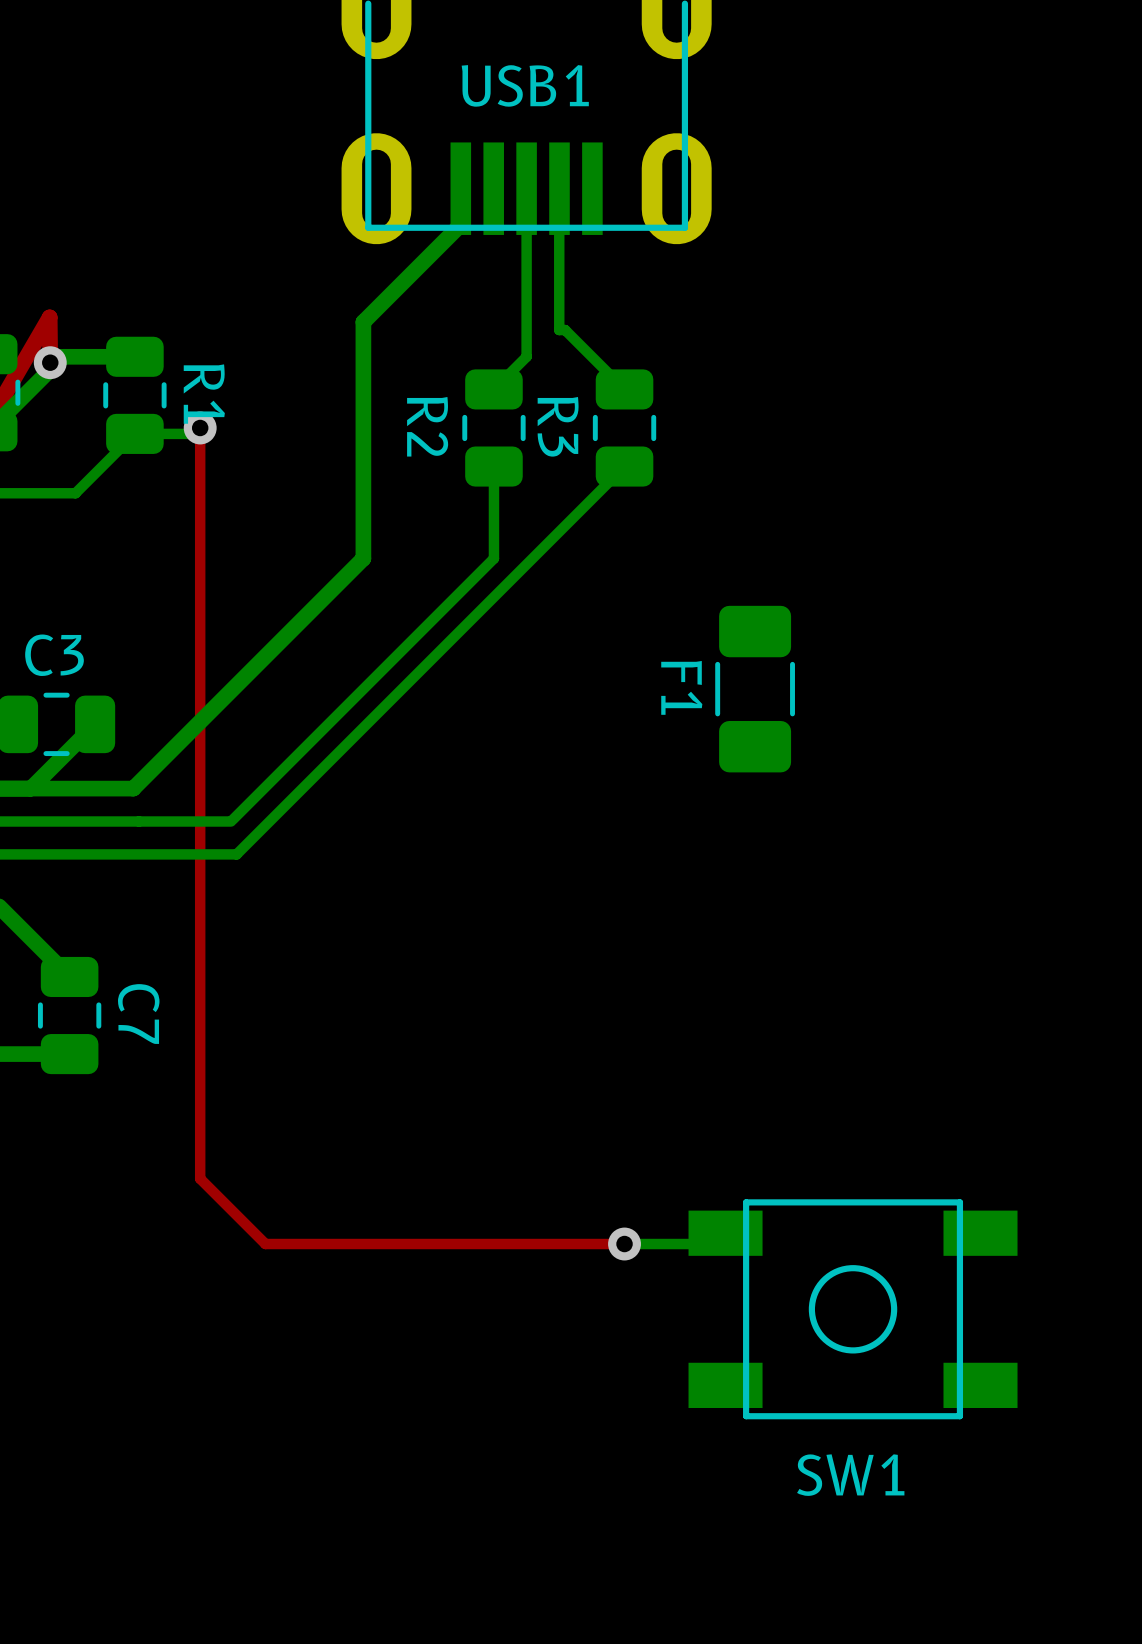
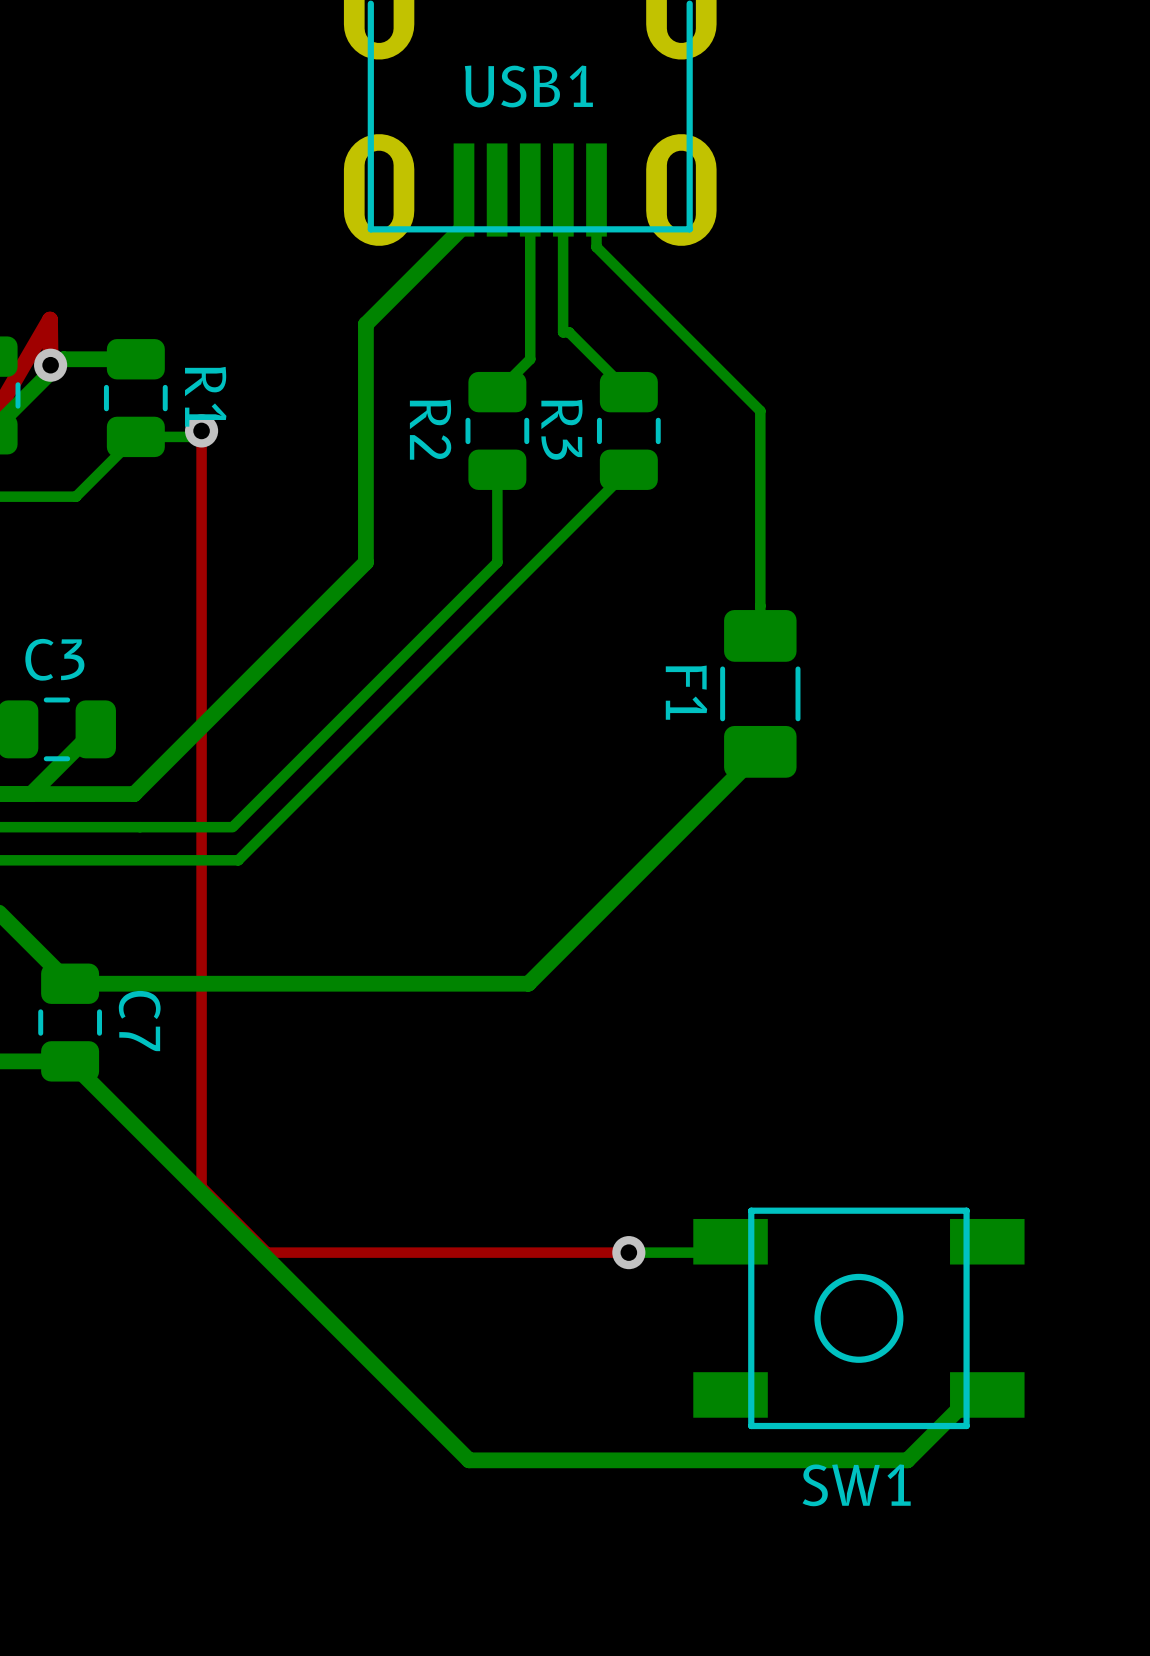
bottom track: none -> (596, 190) (596, 247) (760, 410) (760, 635)
bottom track: none -> (760, 751) (528, 983) (70, 983)
bottom track: none -> (70, 1061) (469, 1460) (907, 1460) (972, 1394) (987, 1394)

